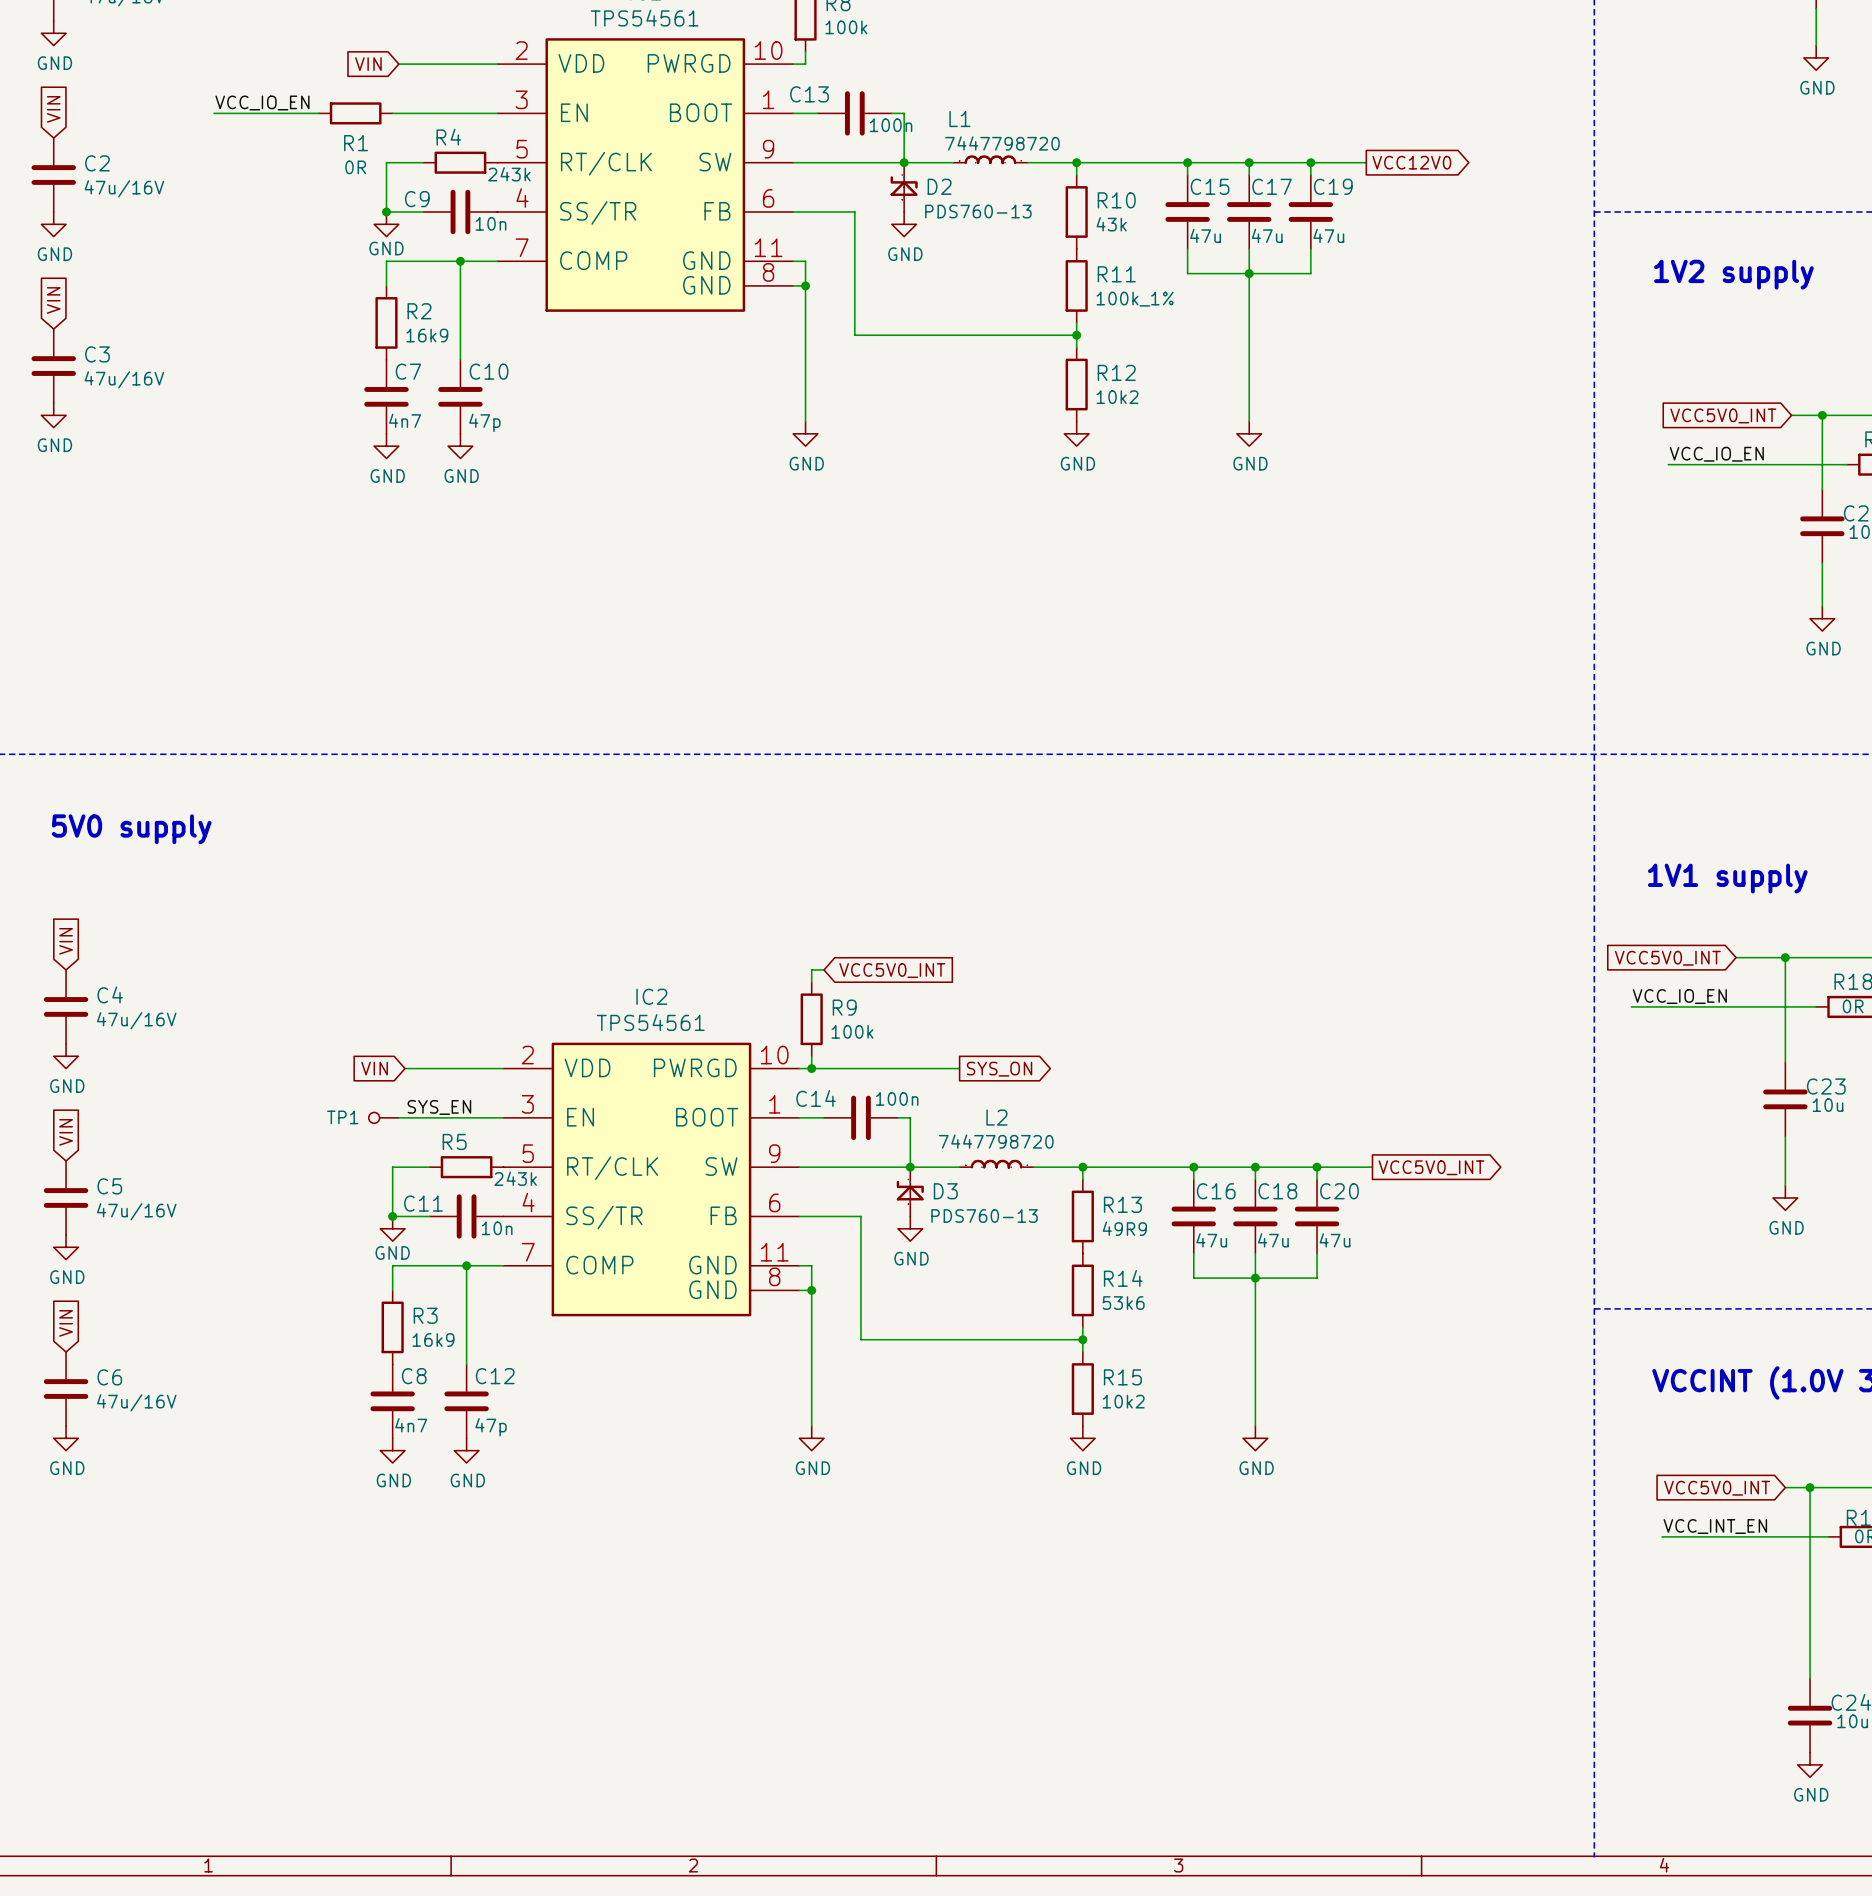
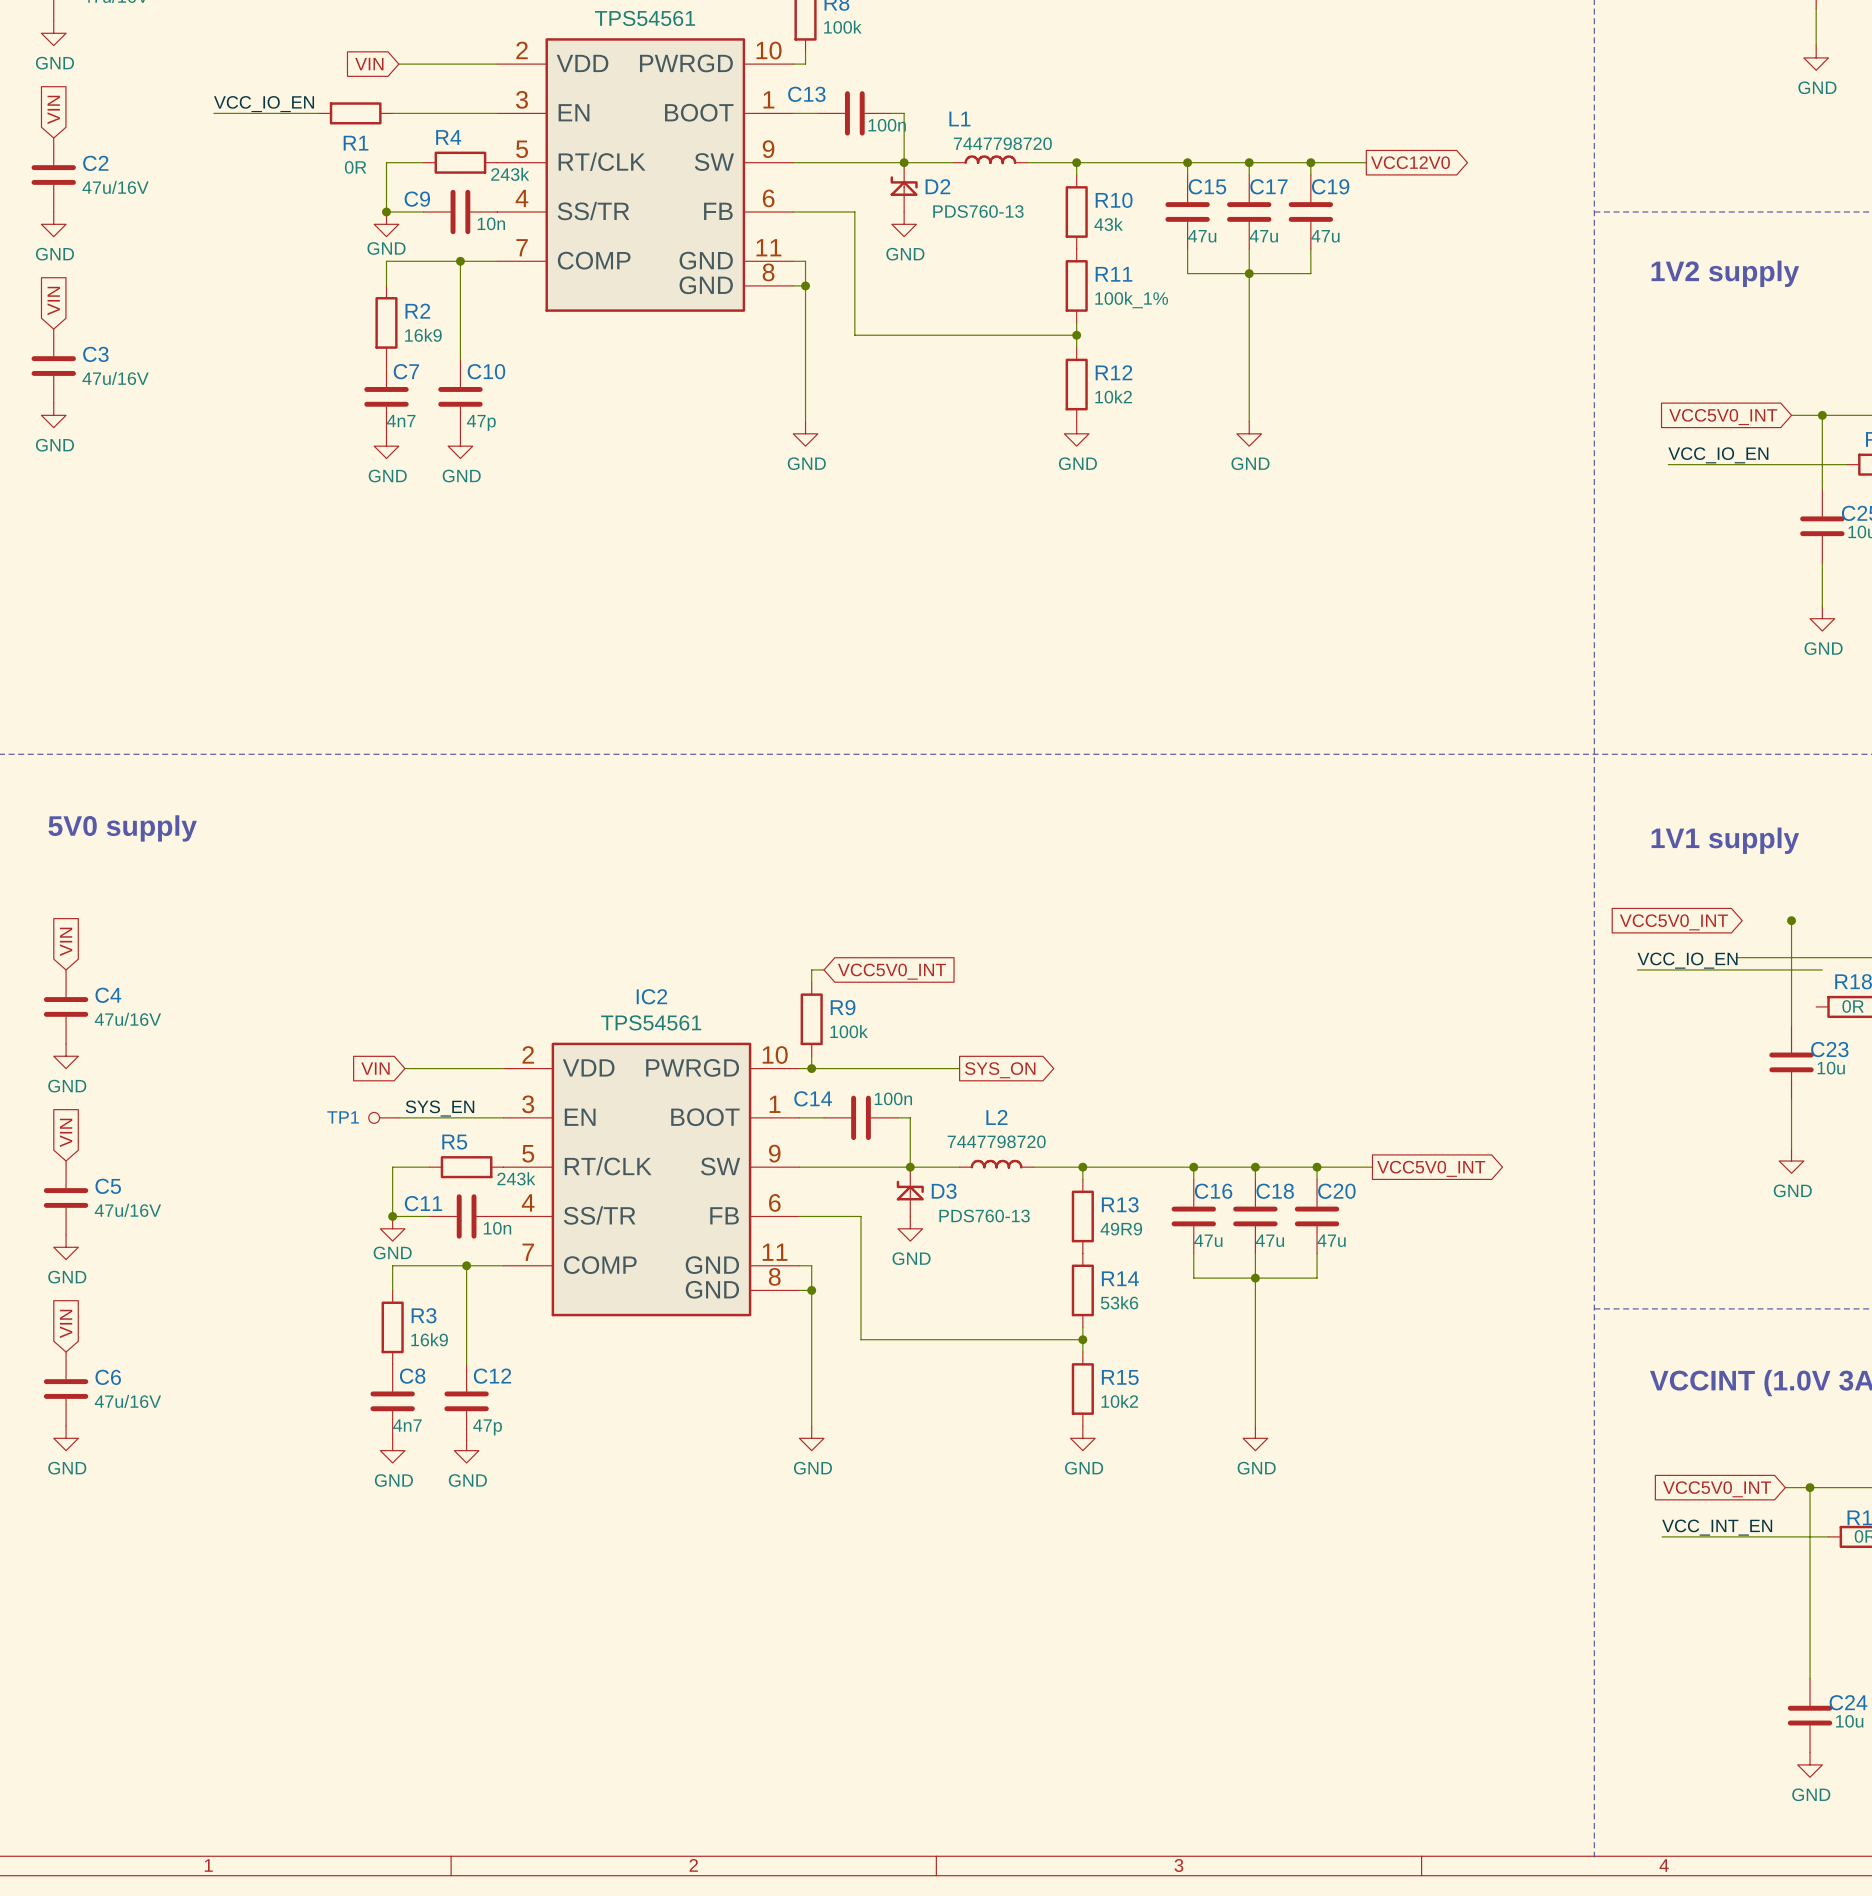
text position: 1V1 supply (1727, 878) -> 1V1 supply (1725, 840)
wire: (1785, 957) (1785, 1062) -> (1791, 920) (1791, 1025)
junction position: (1785, 957) -> (1791, 920)
global label position: VCC5V0_INT (1667, 958) -> VCC5V0_INT (1673, 922)
label position: VCC_IO_EN (1679, 996) -> VCC_IO_EN (1687, 960)
wire: (1631, 1006) (1816, 1006) -> (1637, 969) (1822, 969)
C23 position: (1785, 1099) -> (1791, 1062)
wire: (1785, 1136) (1785, 1185) -> (1791, 1099) (1791, 1148)
power symbol position: GND (1785, 1197) -> GND (1791, 1161)

